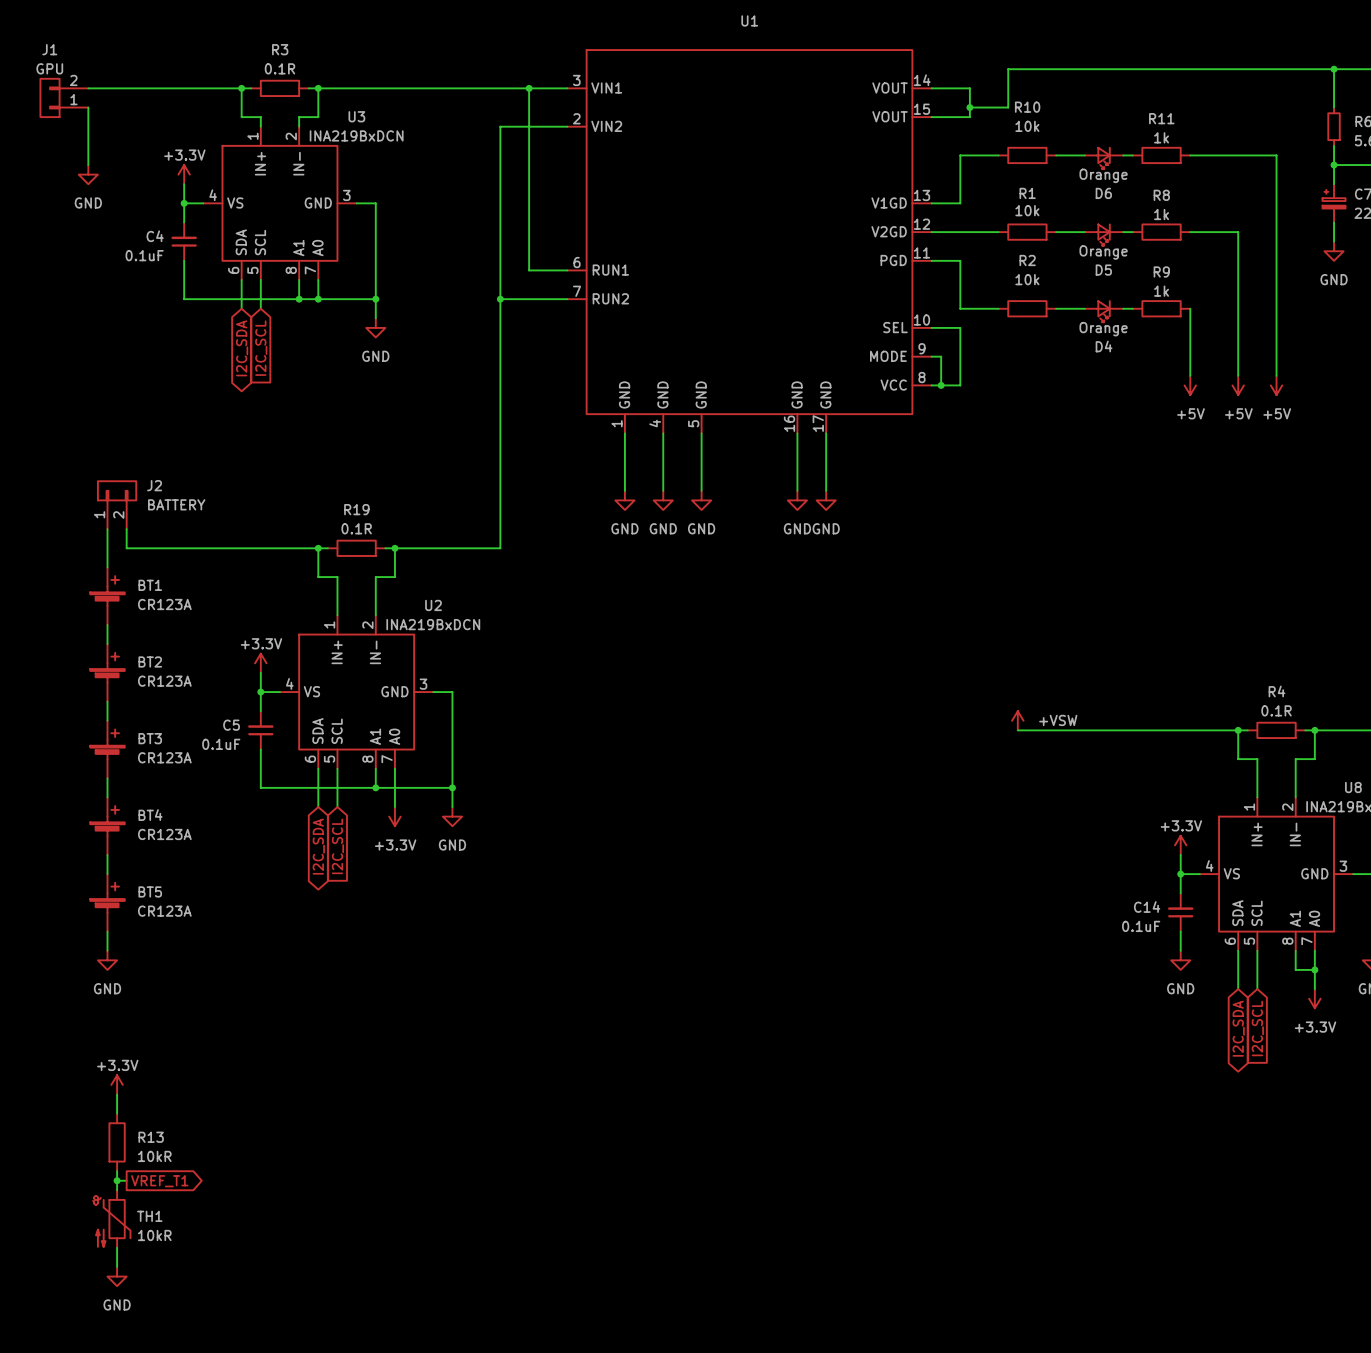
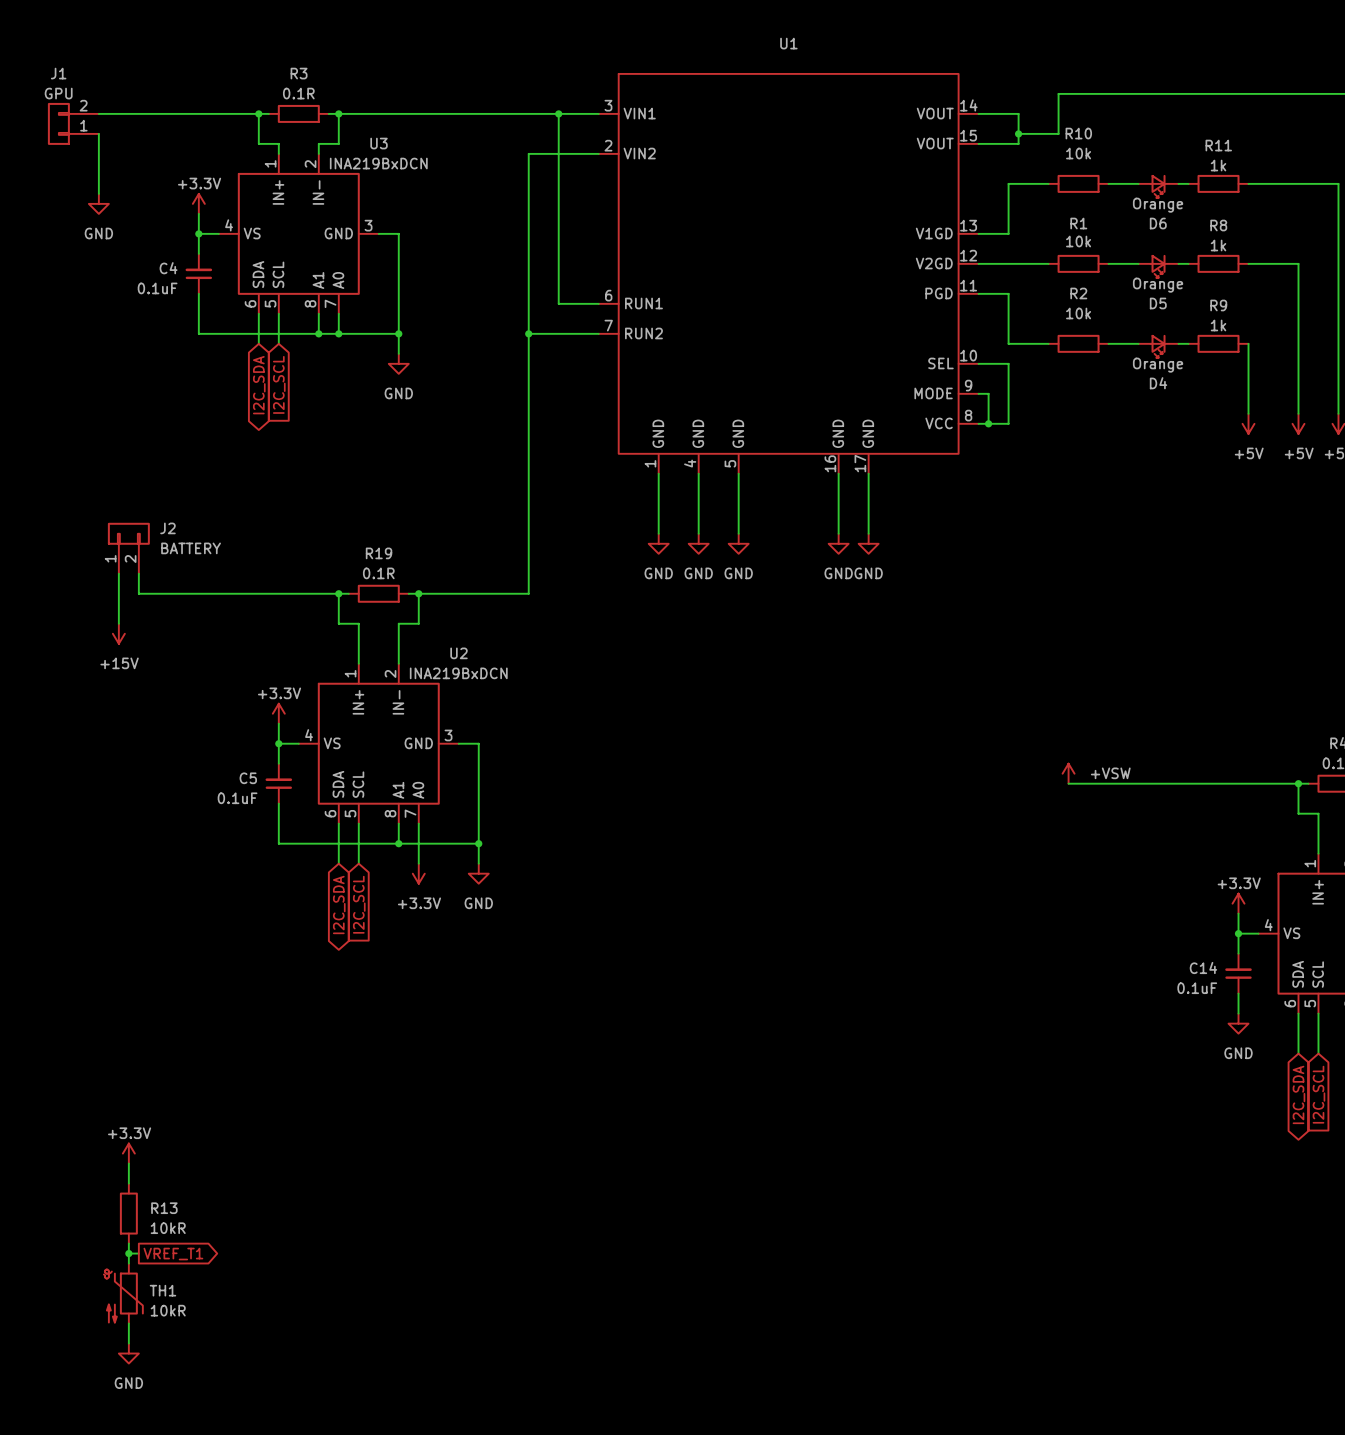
power symbol: none -> +15V (118, 633)
BT1: CR123A (107, 596) -> none
wire: (107, 624) (107, 644) -> none
BT2: CR123A (107, 672) -> none
wire: (107, 701) (107, 720) -> none
BT3: CR123A (107, 749) -> none
wire: (107, 778) (107, 797) -> none
BT4: CR123A (107, 826) -> none
wire: (107, 854) (107, 874) -> none
BT5: CR123A (107, 902) -> none
wire: (107, 931) (107, 950) -> none
power symbol: GND (107, 960) -> none

